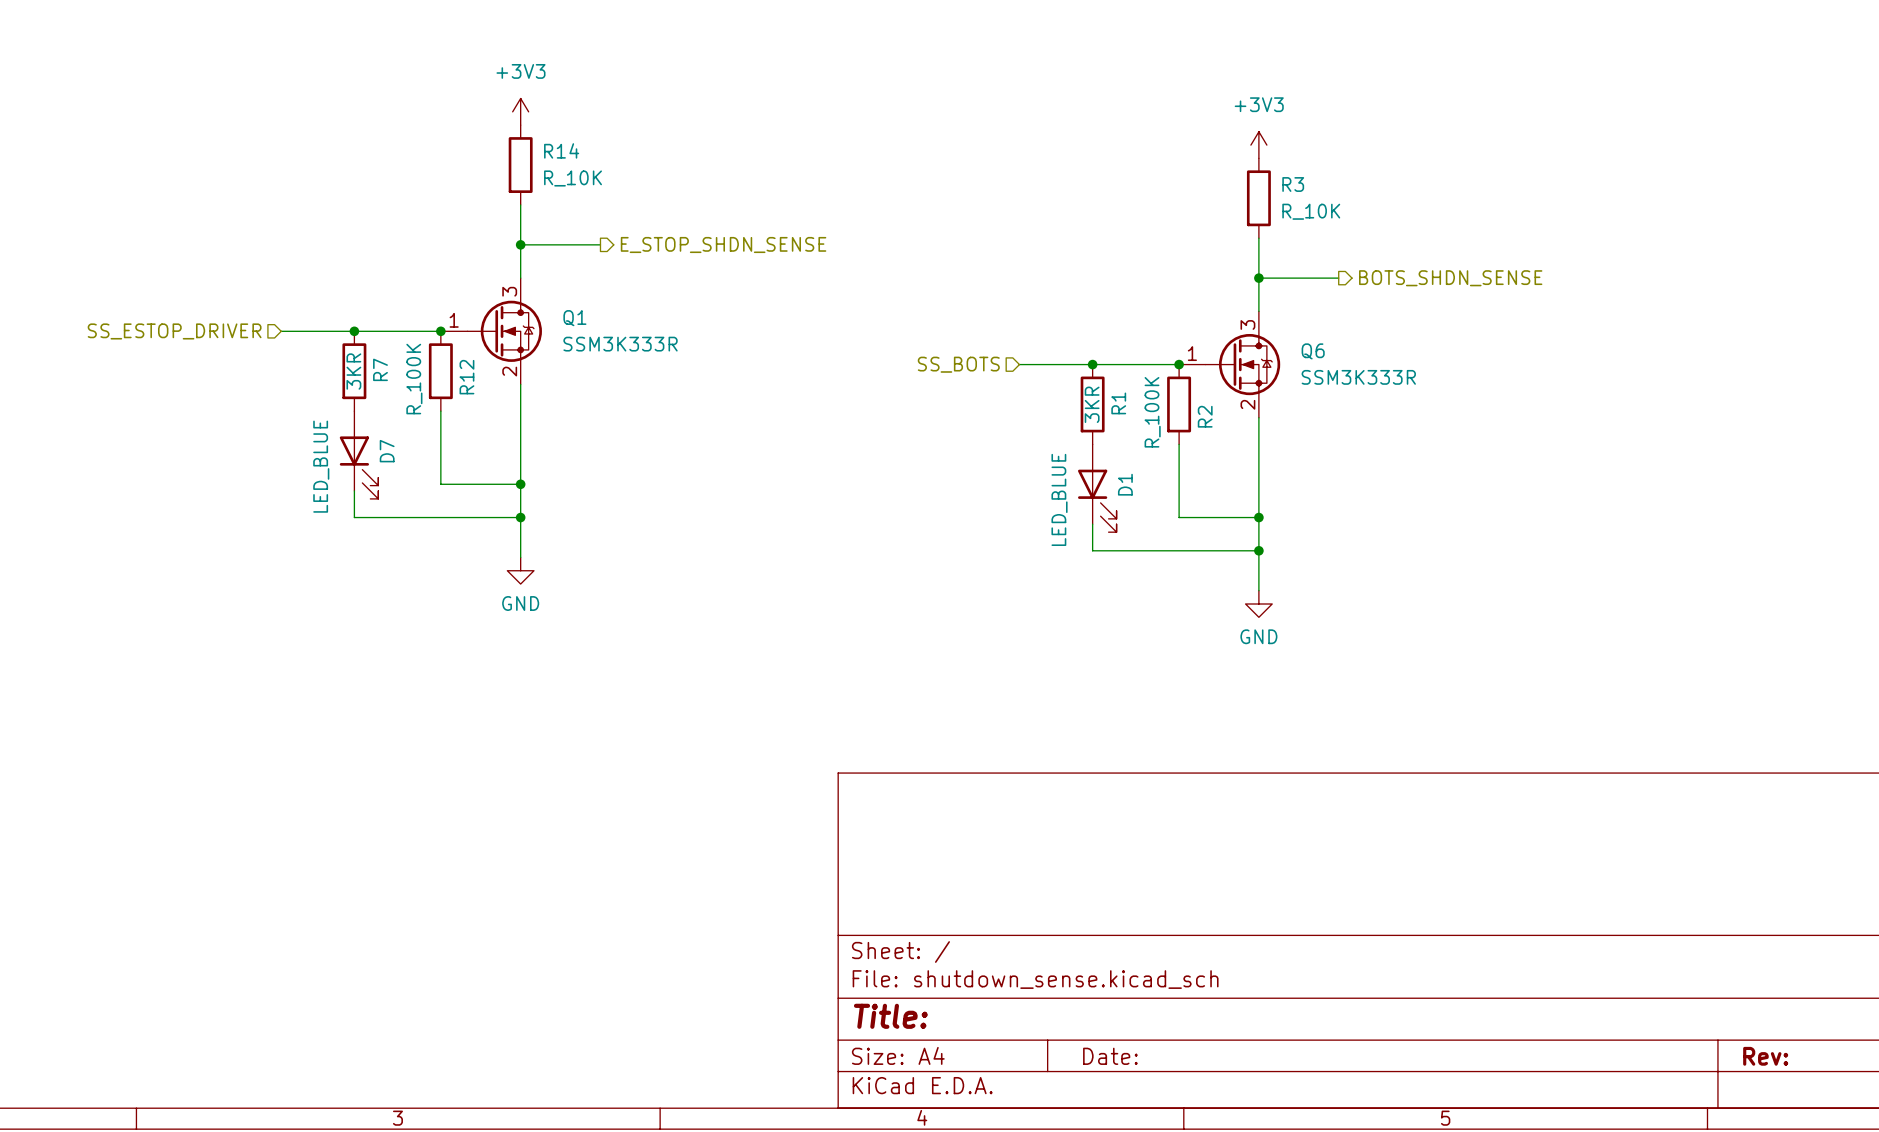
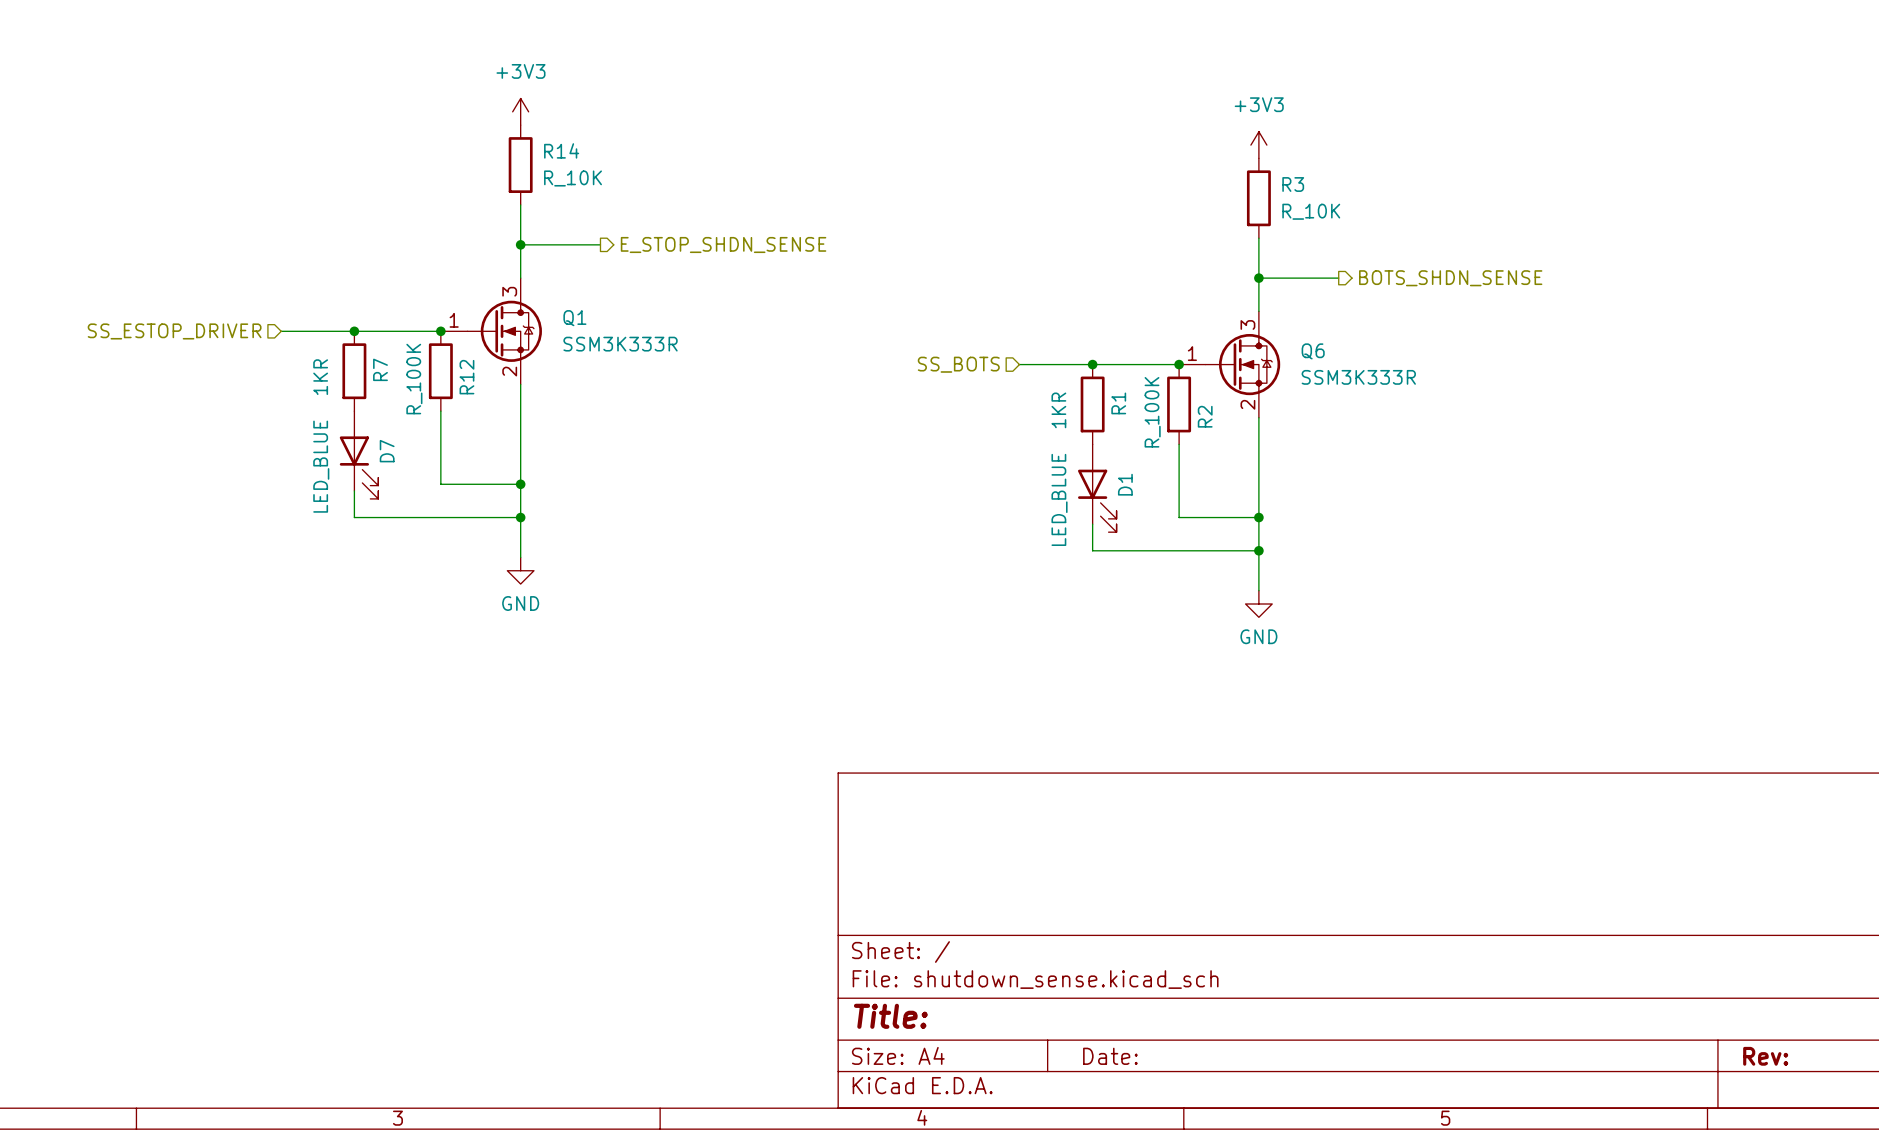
R7 value: 3KR (353, 371) -> 1KR (320, 377)
R1 value: 3KR (1092, 404) -> 1KR (1058, 410)

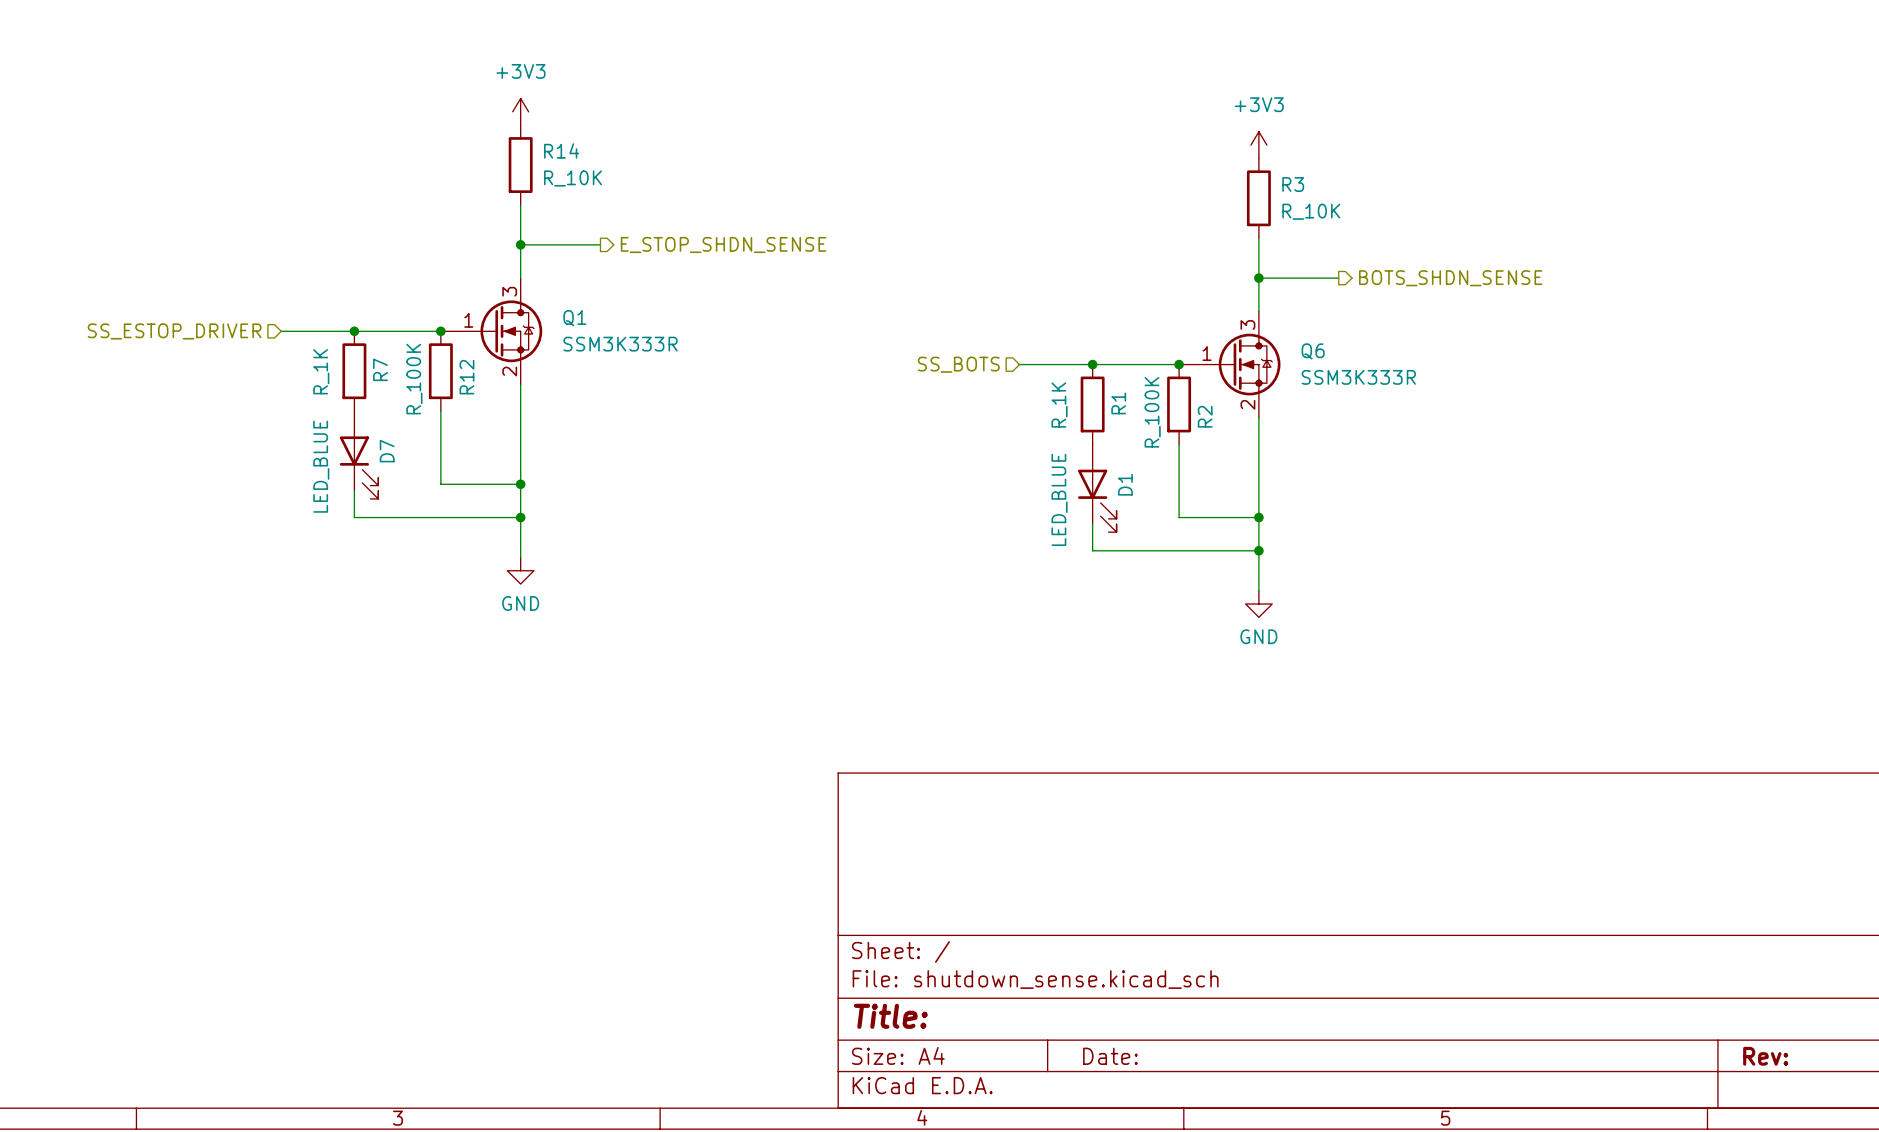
Q1 symbol: [440, 278, 542, 385] -> [440, 278, 543, 385]
Q6 symbol: [1179, 311, 1281, 418] -> [1179, 311, 1281, 418]
R7 value: 1KR (320, 377) -> R_1K (321, 371)
R1 value: 1KR (1058, 410) -> R_1K (1059, 405)

